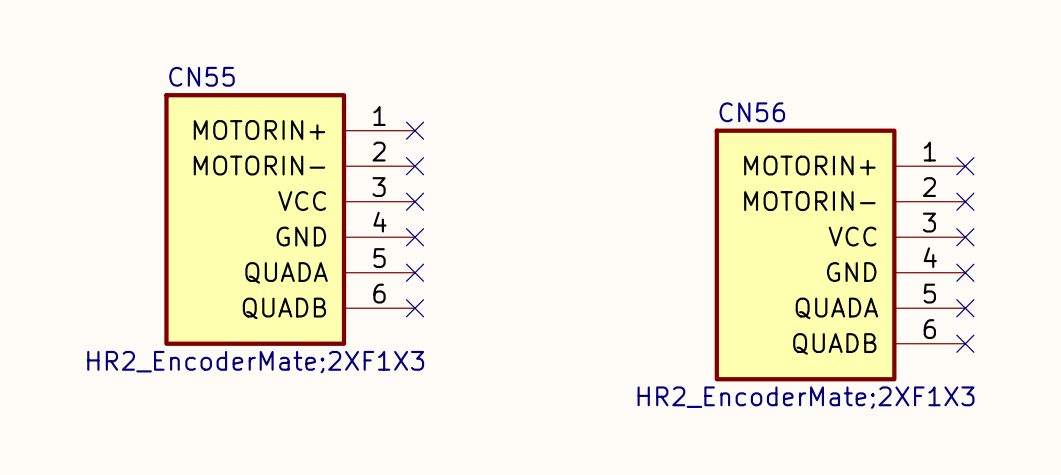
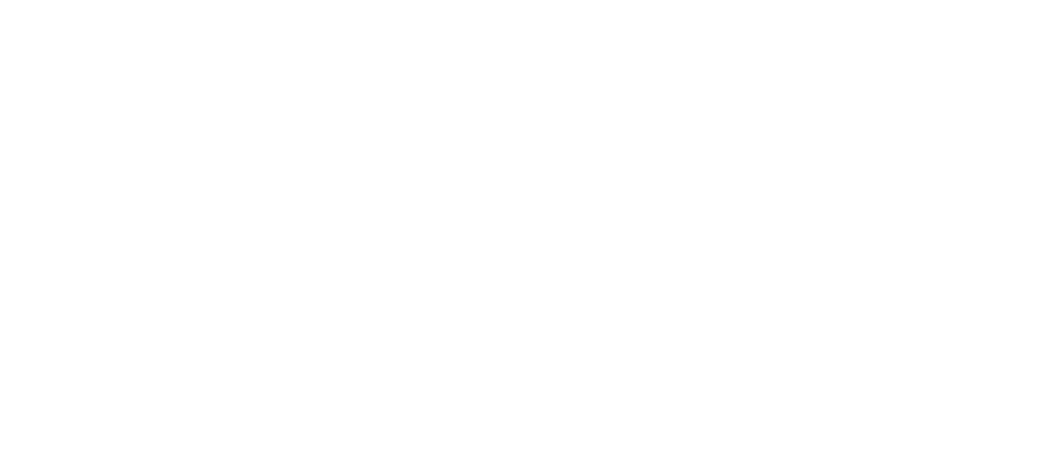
no-connect mark: (415, 130) -> none
no-connect mark: (415, 166) -> none
no-connect mark: (965, 166) -> none
no-connect mark: (415, 201) -> none
no-connect mark: (965, 201) -> none
CN55: HR2_EncoderMate;2XF1X3 (289, 219) -> none
no-connect mark: (415, 237) -> none
no-connect mark: (965, 237) -> none
CN56: HR2_EncoderMate;2XF1X3 (840, 254) -> none
no-connect mark: (415, 272) -> none
no-connect mark: (965, 272) -> none
no-connect mark: (415, 308) -> none
no-connect mark: (965, 308) -> none
no-connect mark: (965, 343) -> none

